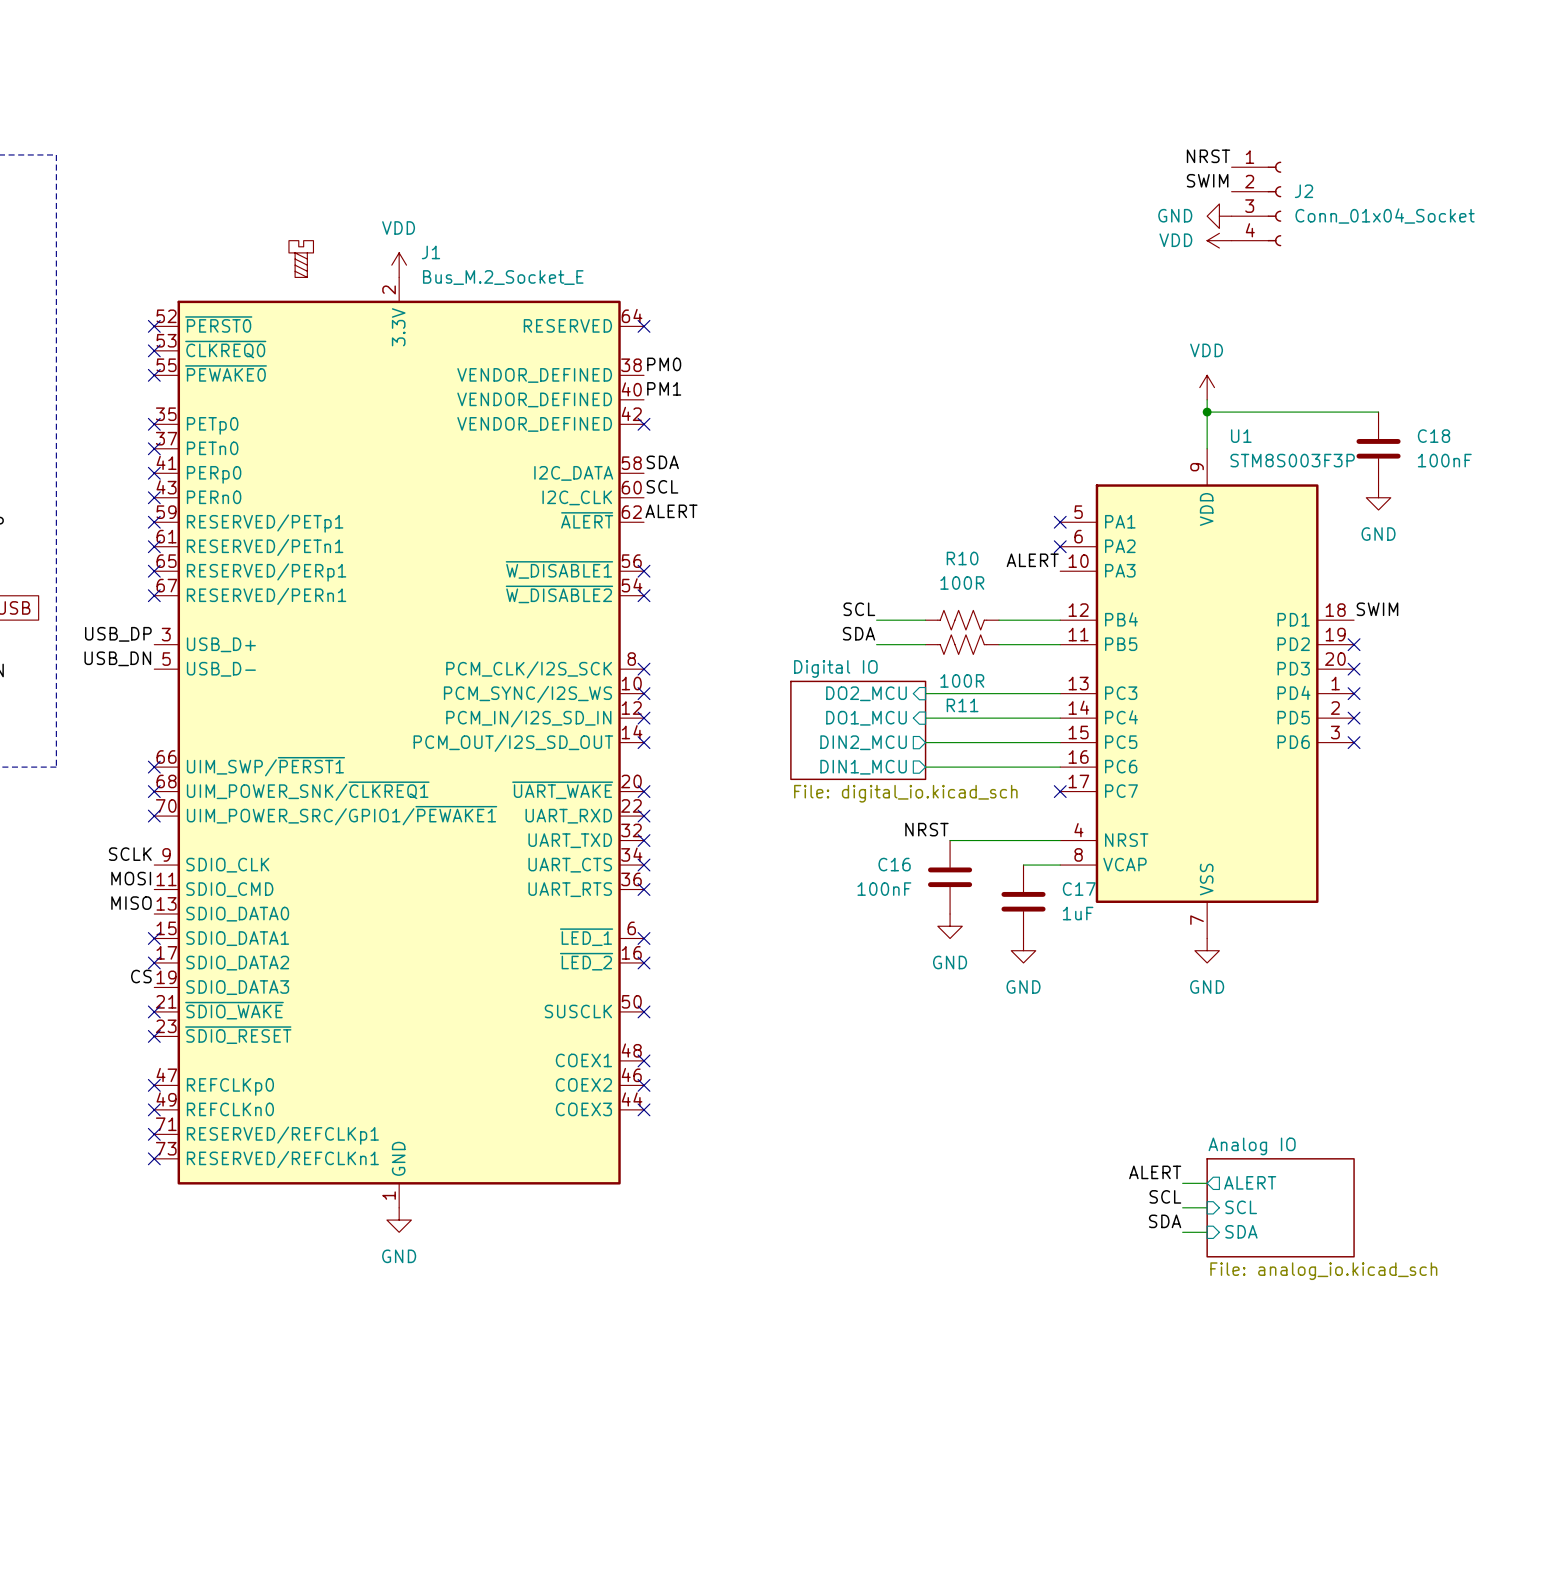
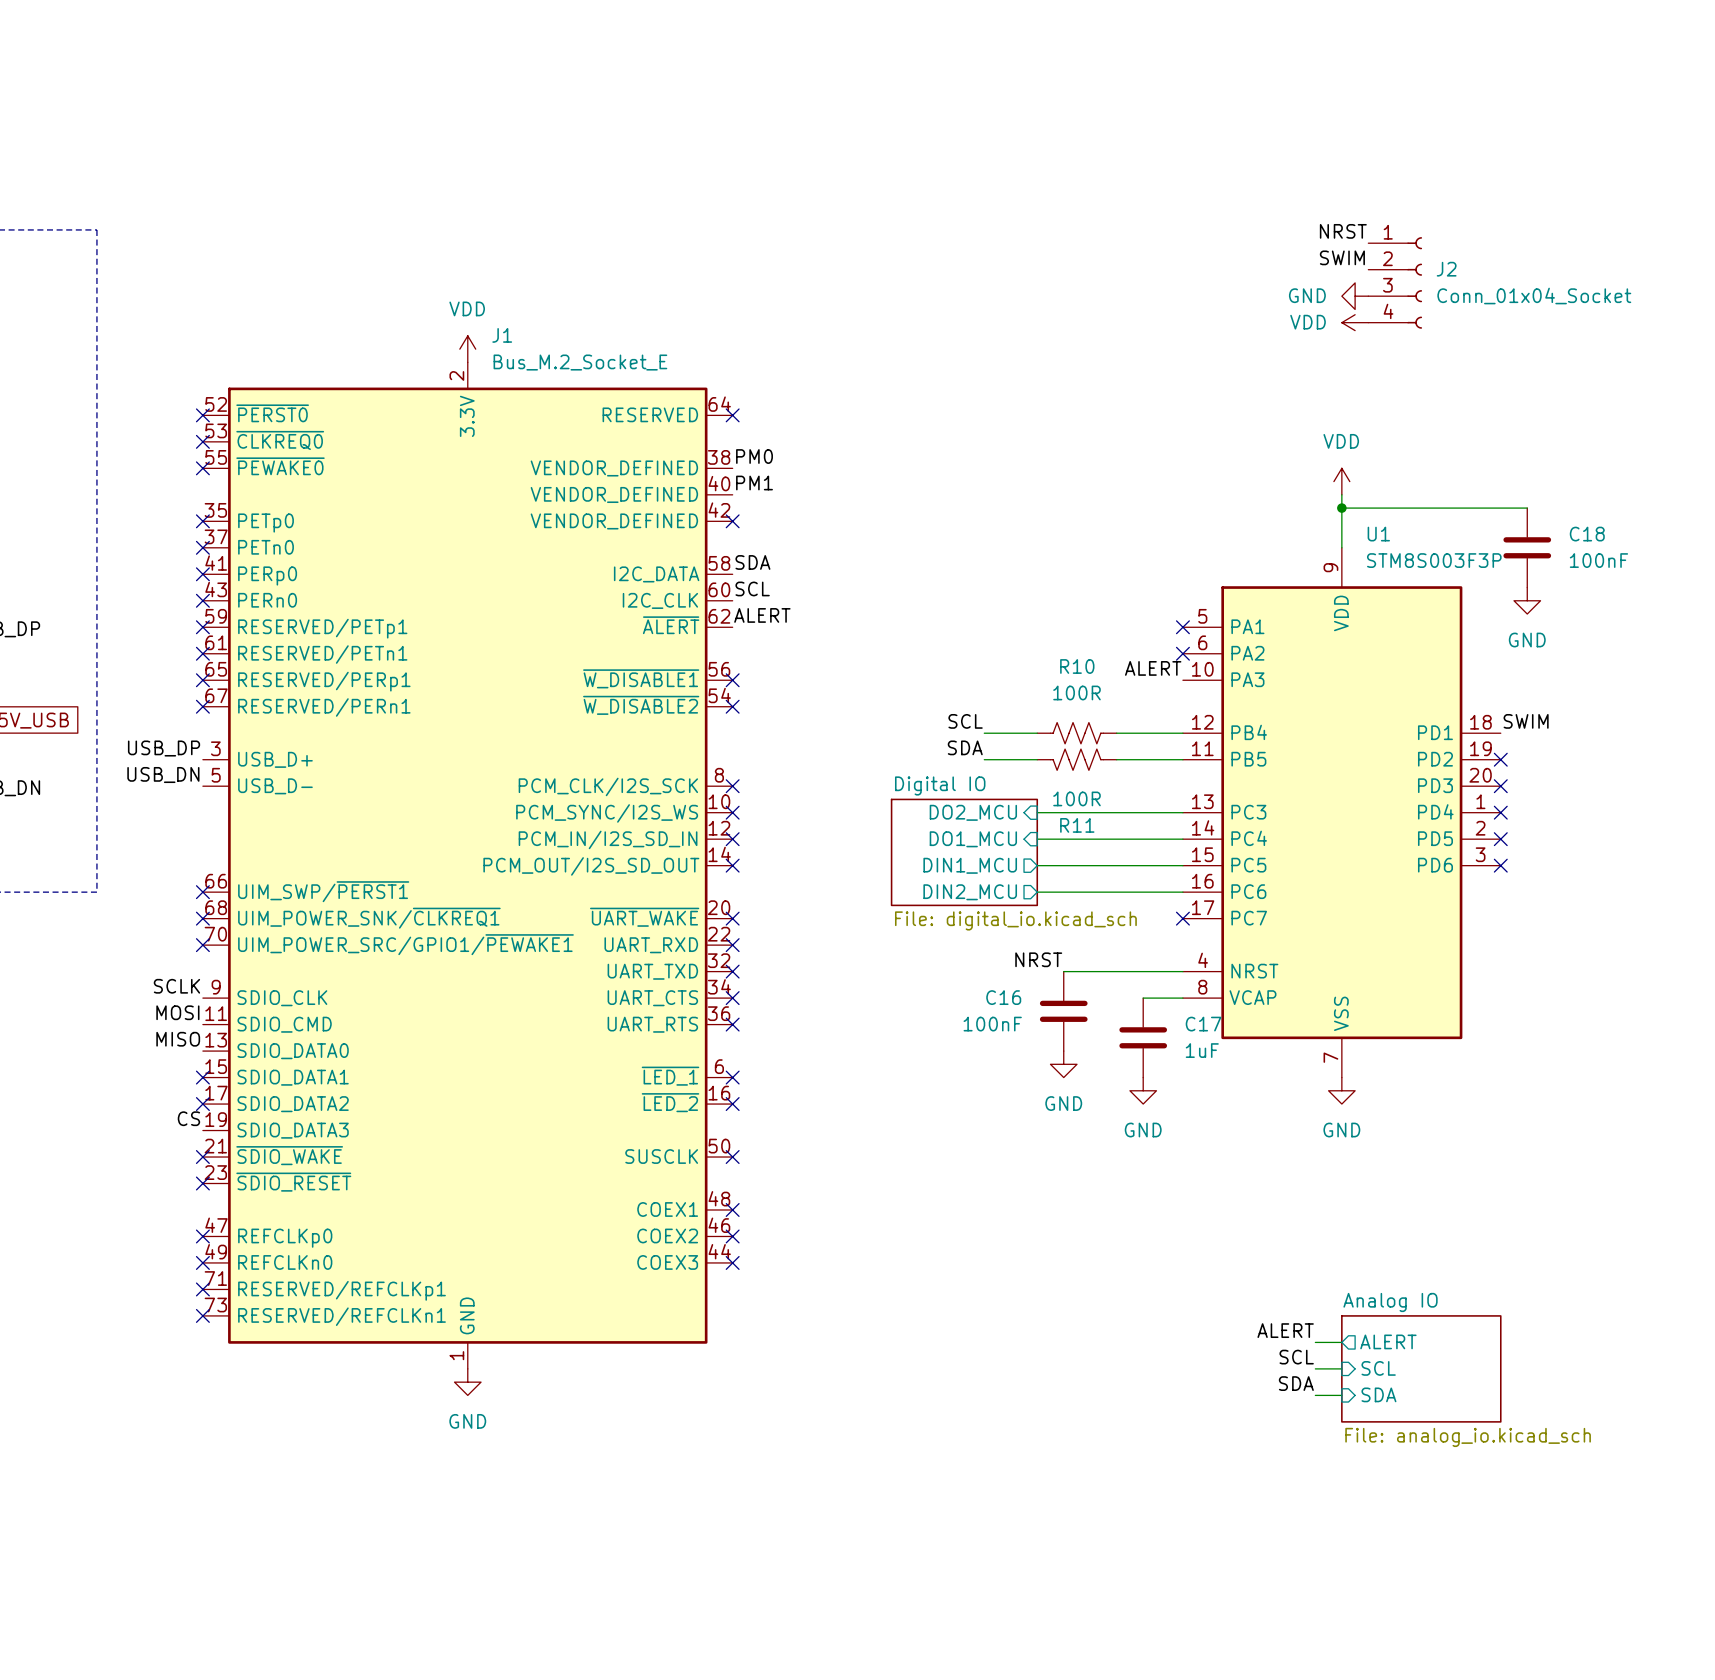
part: (301, 259) -> none
sheet pin: DIN2_MCU (863, 742) -> DIN1_MCU (970, 865)
sheet pin: DIN1_MCU (863, 767) -> DIN2_MCU (970, 892)

